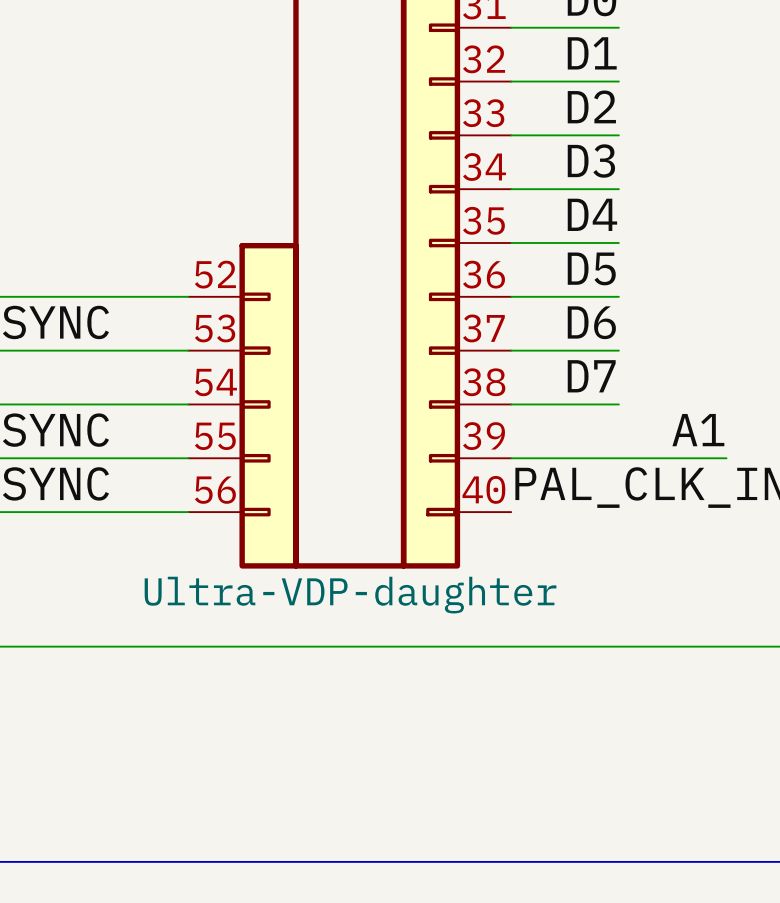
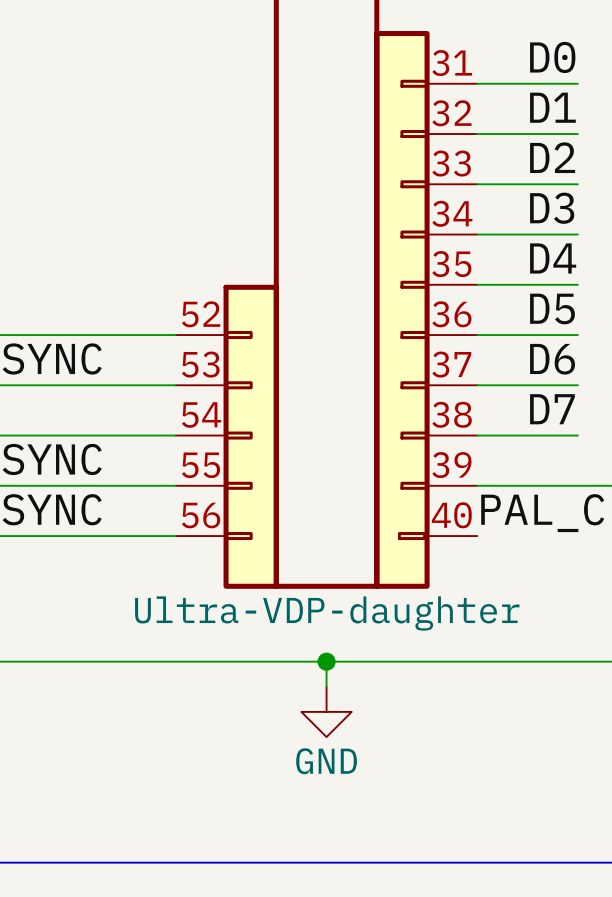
wire: none -> (326, 661) (326, 686)
junction: none -> (326, 661)
power symbol: none -> GND (326, 711)

